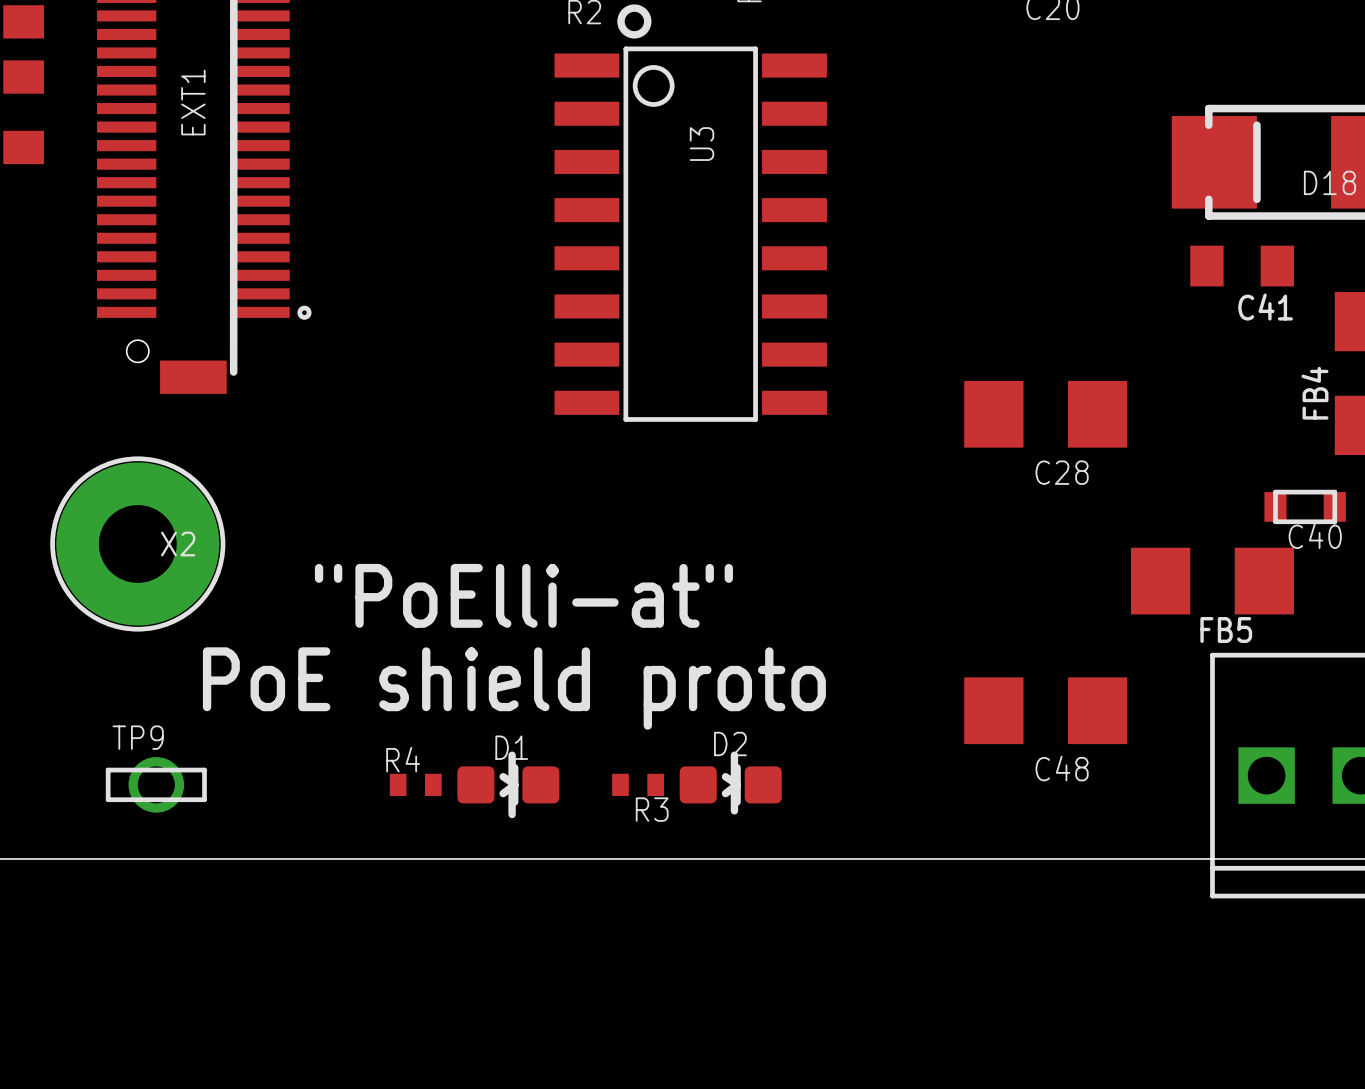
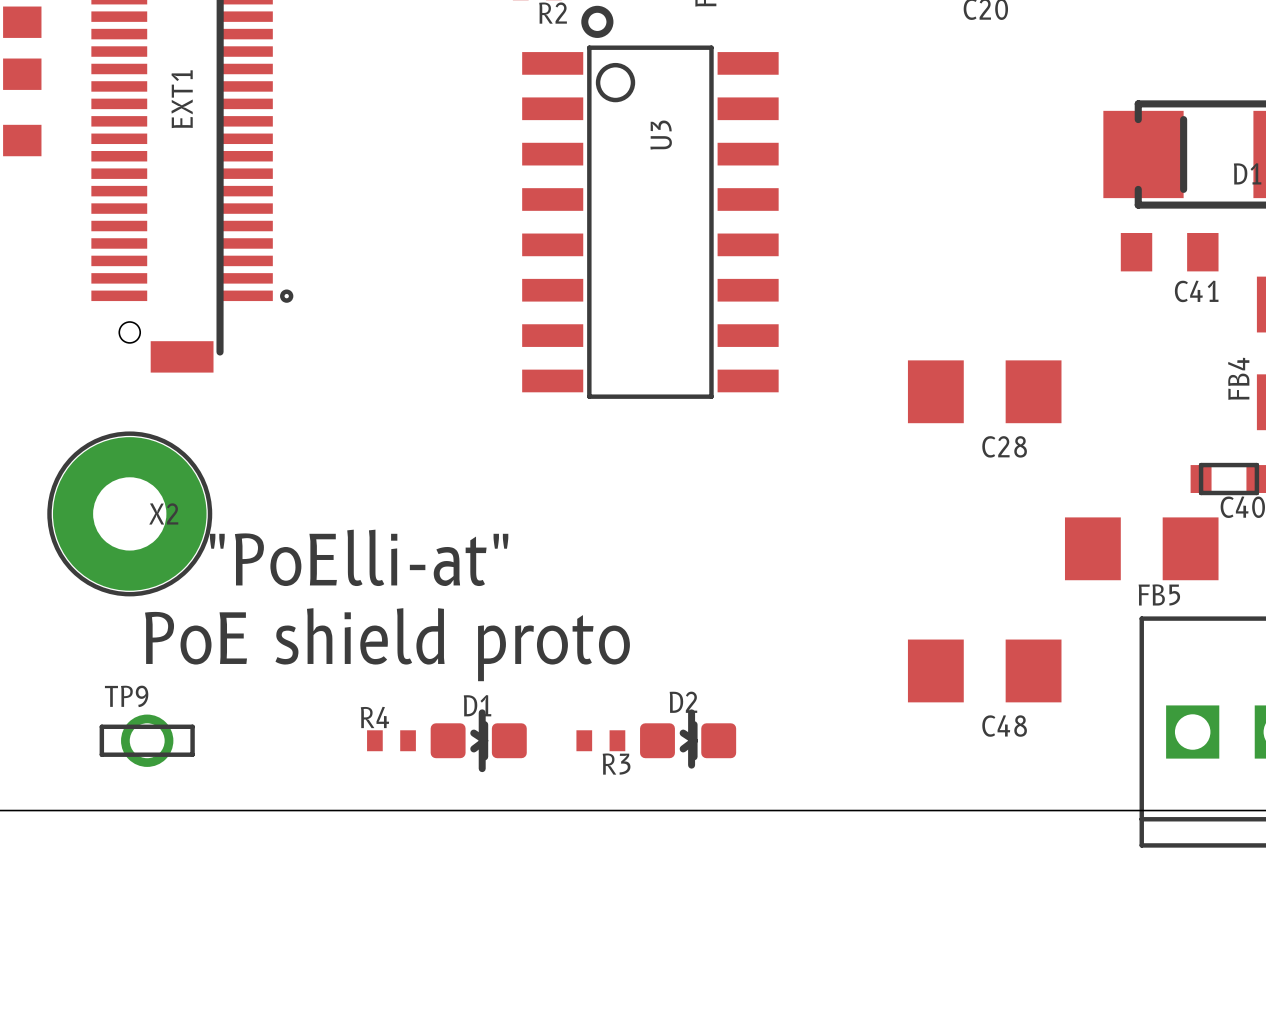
text position: "PoElli-at" (523, 595) -> "PoElli-at" (359, 557)
text position: PoE shield proto (514, 688) -> PoE shield proto (387, 644)

